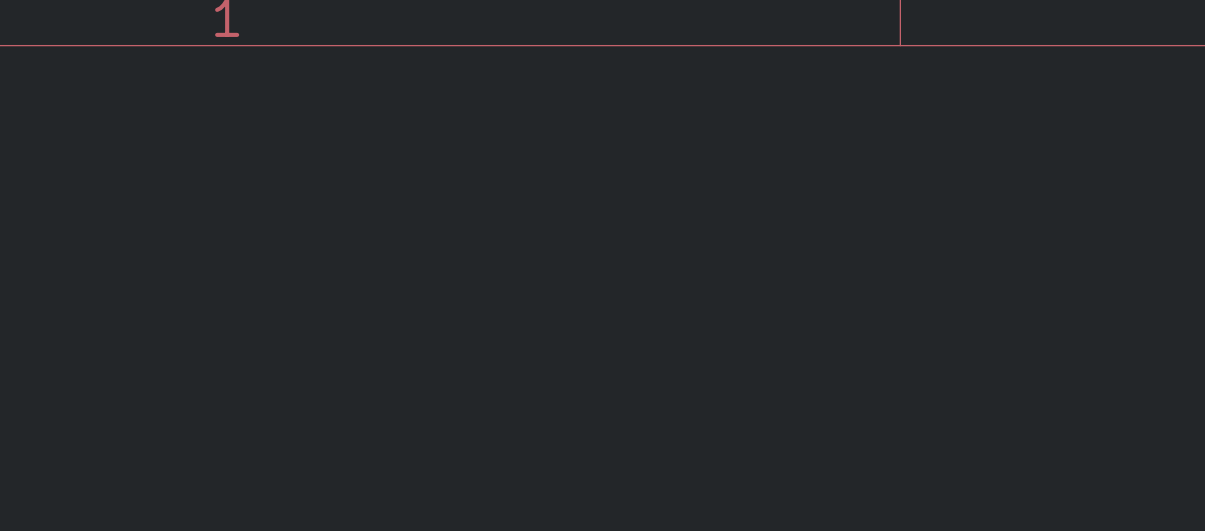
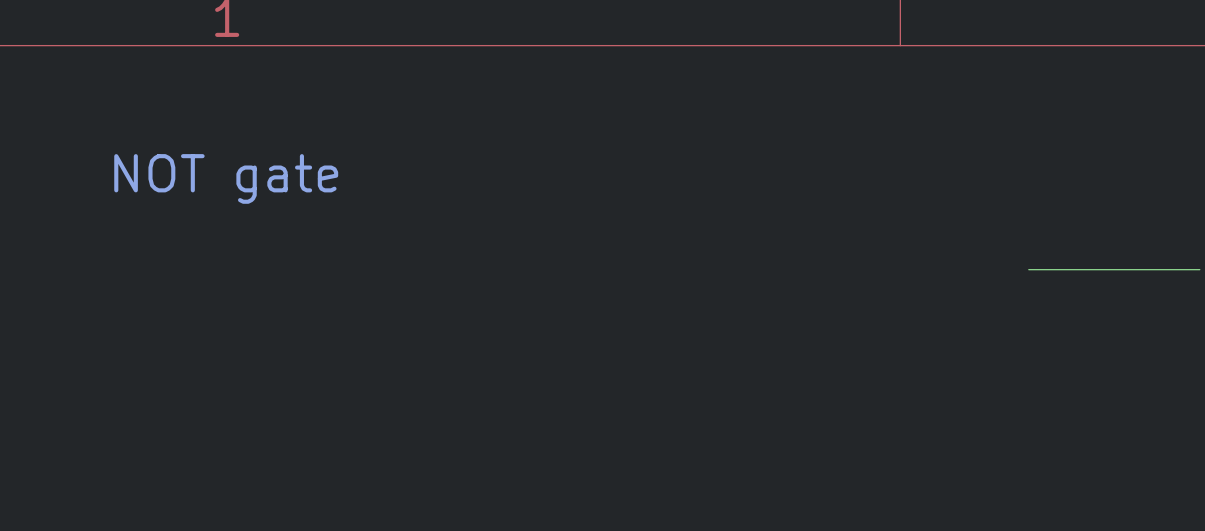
text: none -> NOT gate (226, 178)
wire: none -> (1028, 269) (1199, 269)

